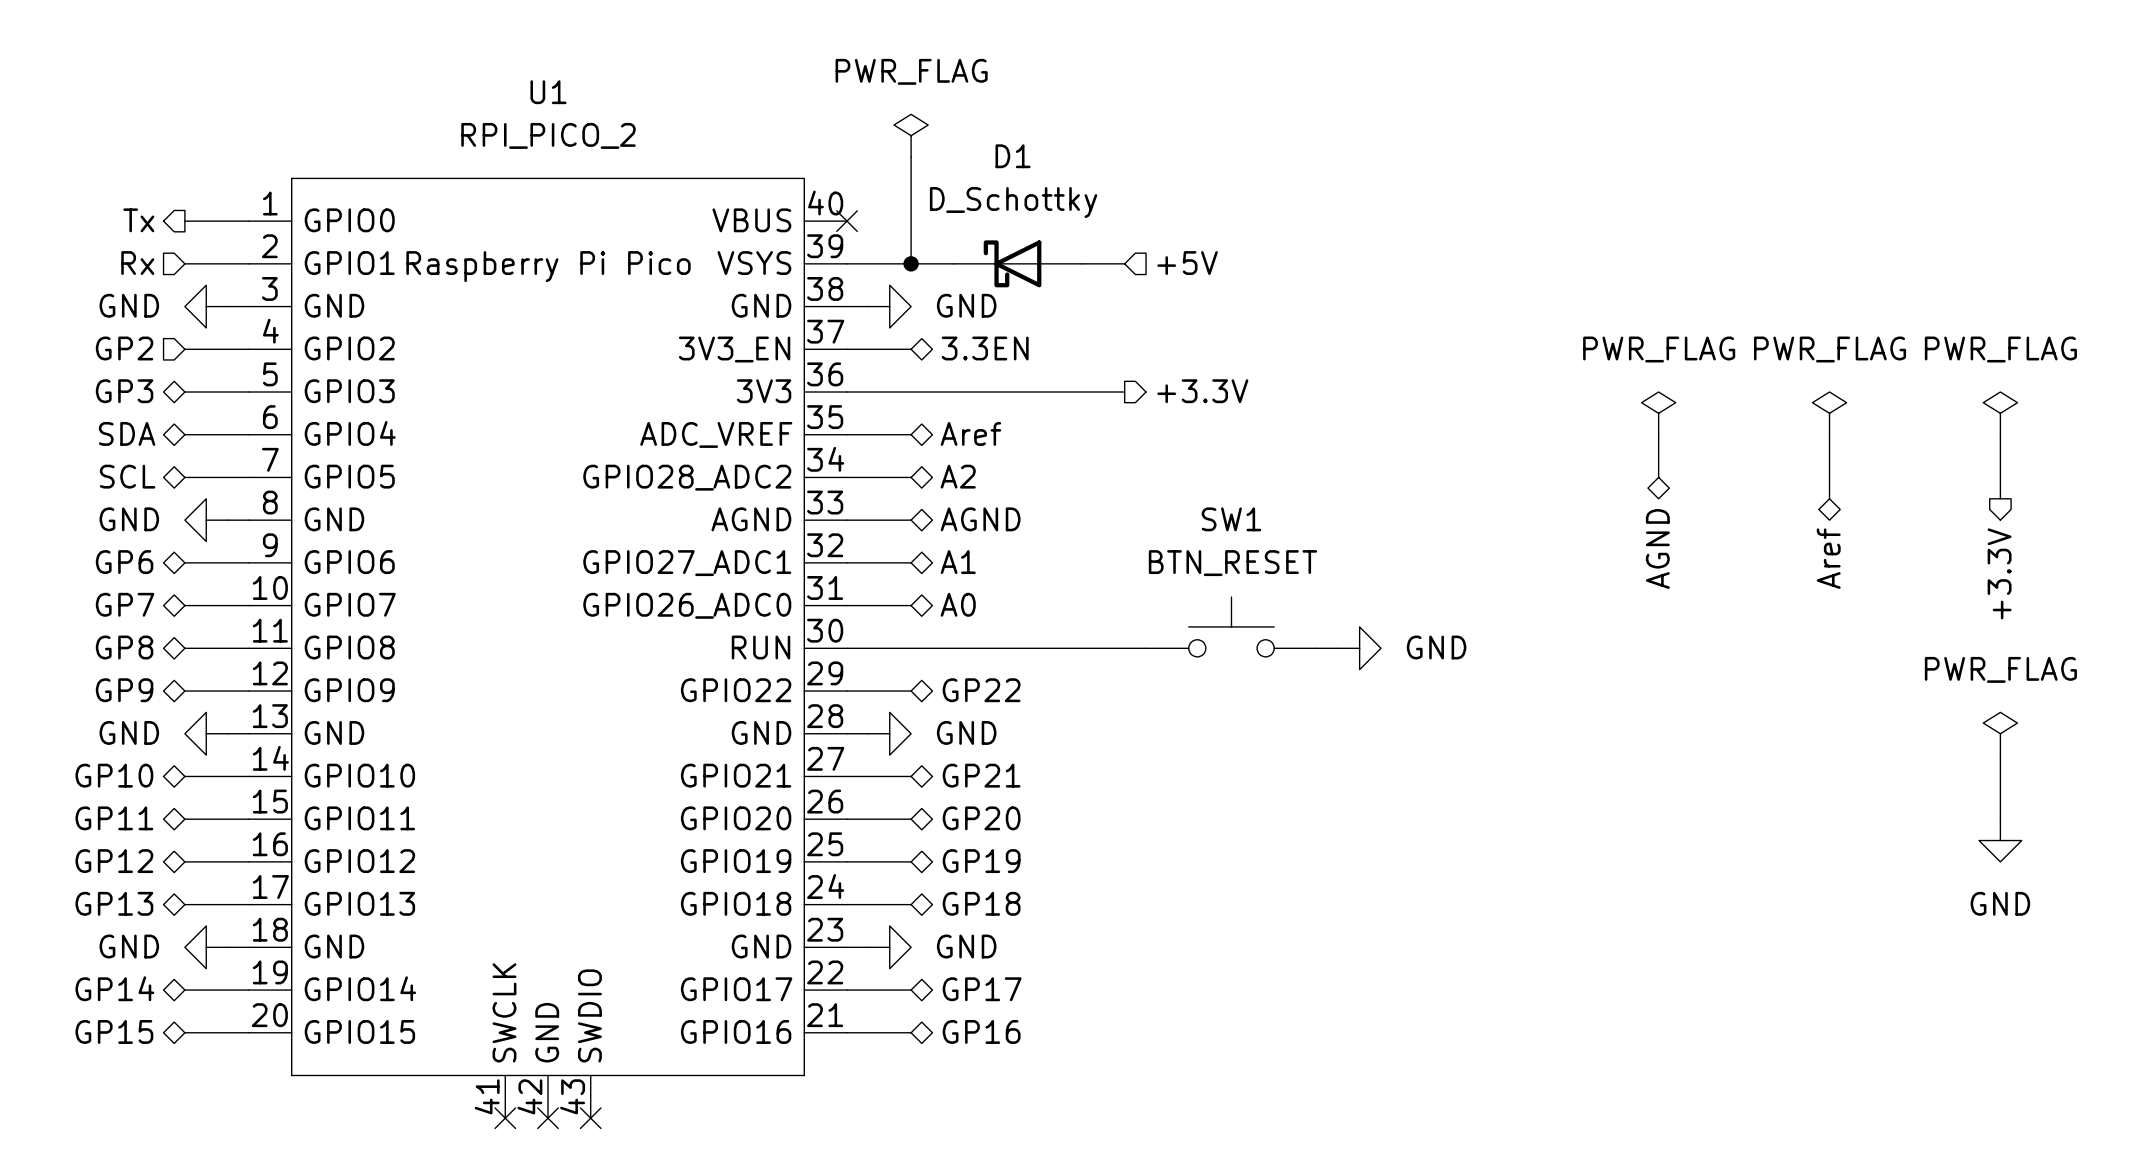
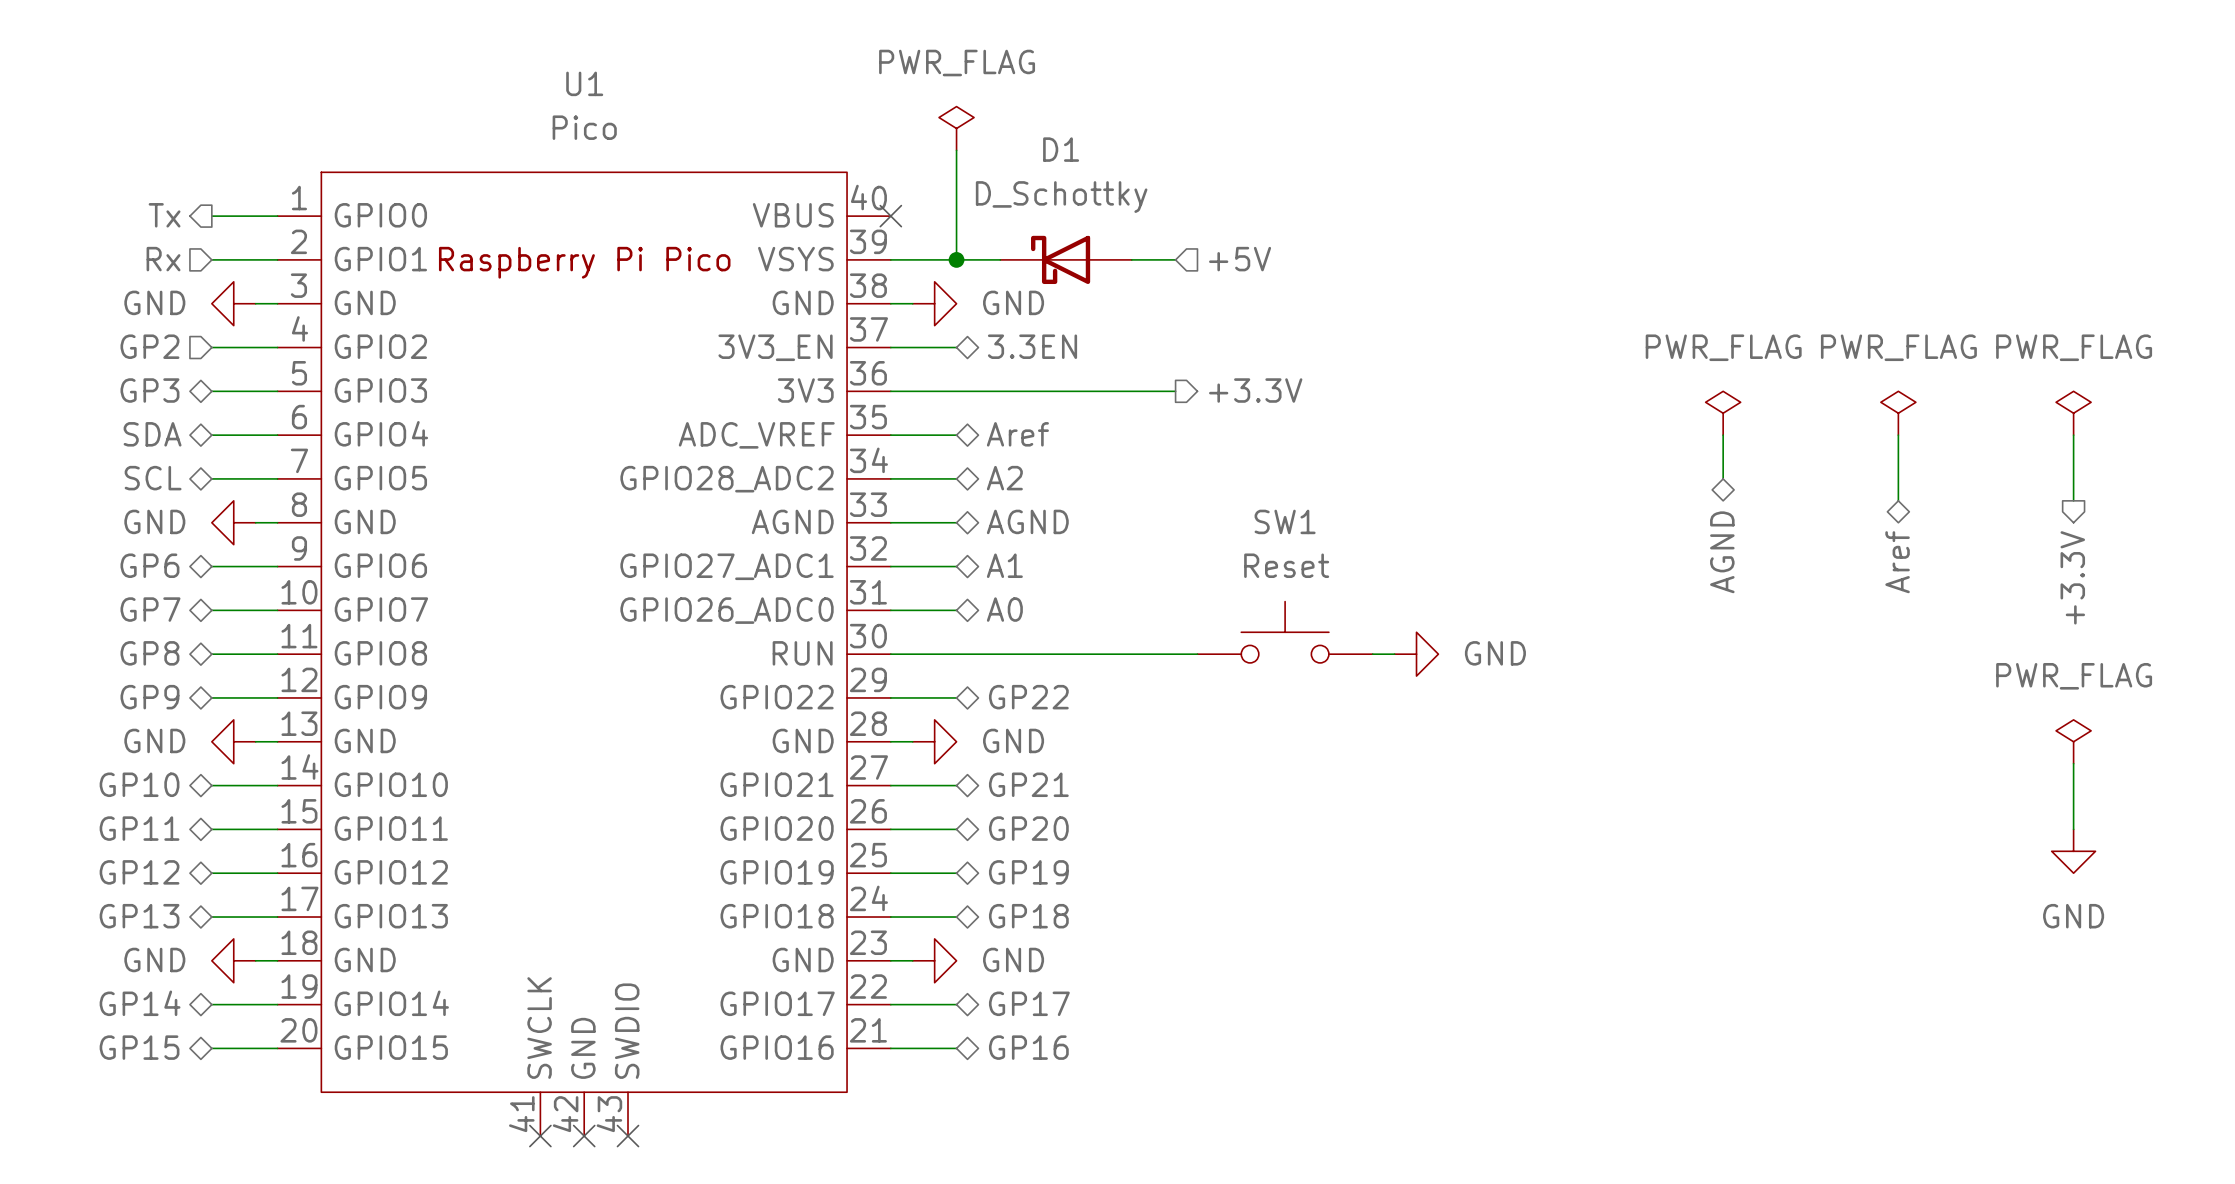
U1 value: RPI_PICO_2 (548, 135) -> Pico (584, 127)
SW1 value: BTN_RESET (1233, 563) -> Reset (1286, 565)

